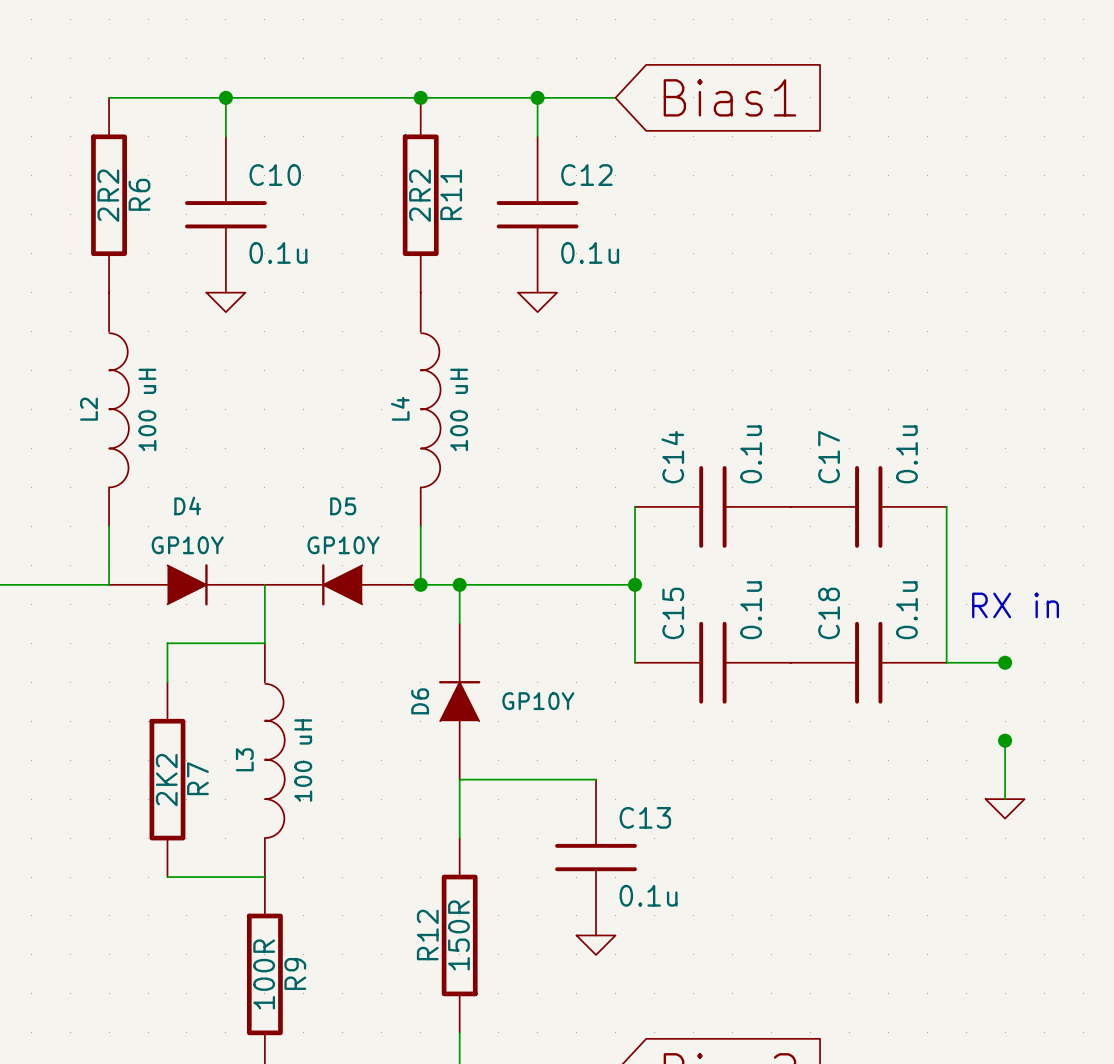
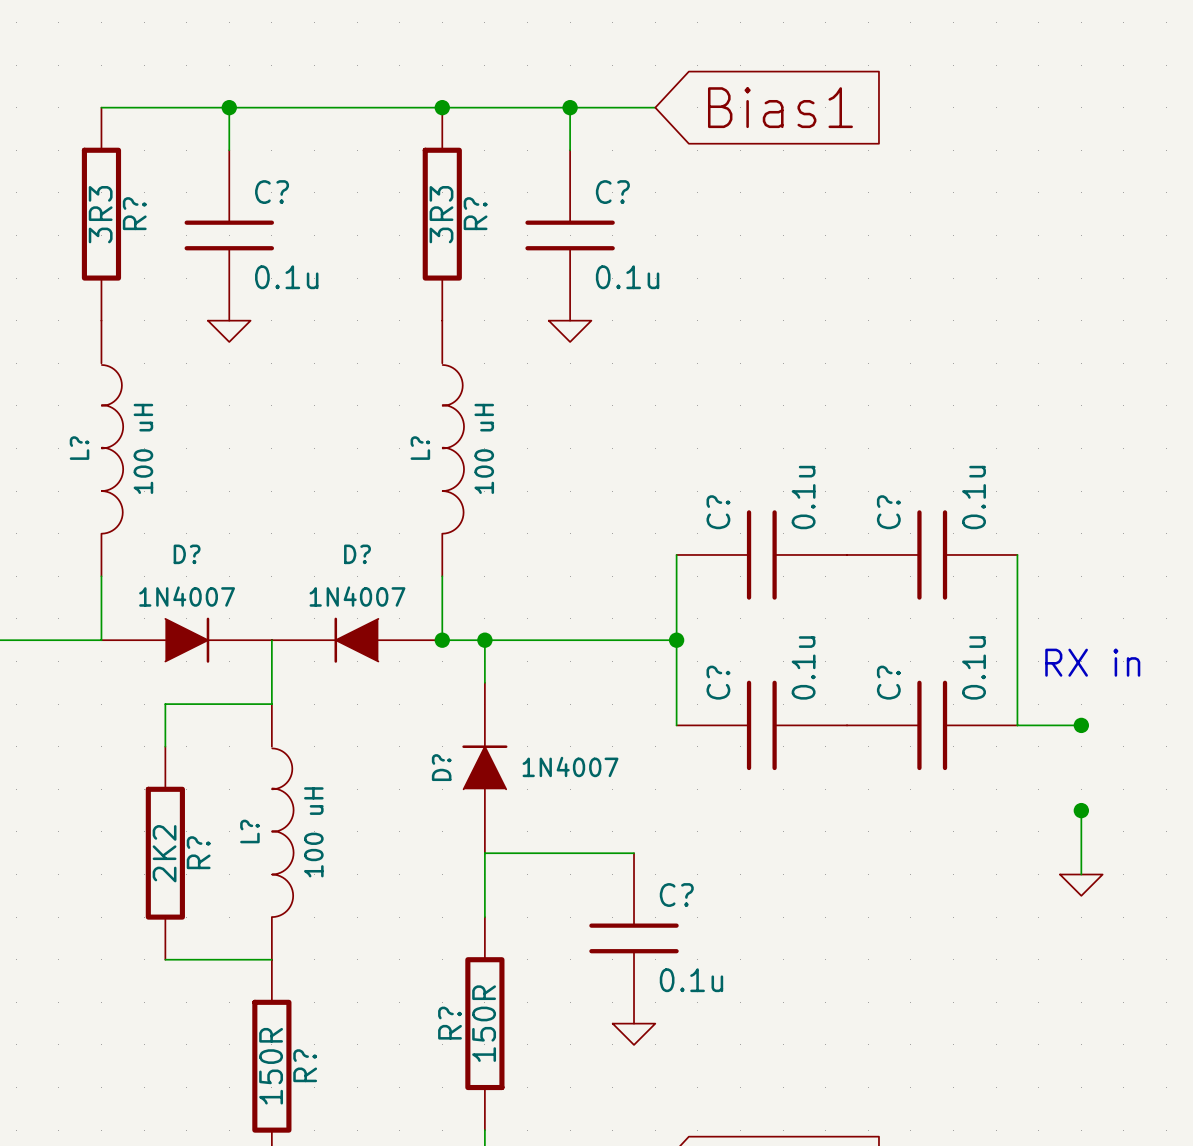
C10 name: C10 (275, 175) -> C? (272, 192)
C12 name: C12 (586, 175) -> C? (612, 192)
R6 name: R6 (139, 194) -> R? (134, 213)
R11 name: R11 (451, 194) -> R? (475, 213)
R6 value: 2R2 (108, 195) -> 3R3 (100, 214)
R11 value: 2R2 (419, 195) -> 3R3 (441, 214)
L4 name: L4 (400, 408) -> L? (420, 448)
L2 name: L2 (88, 409) -> L? (79, 448)
C14 name: C14 (672, 457) -> C? (718, 512)
C17 name: C17 (829, 457) -> C? (888, 512)
D4 name: D4 (187, 505) -> D? (187, 554)
D5 name: D5 (343, 506) -> D? (357, 554)
D4 value: GP10Y (187, 545) -> 1N4007 (187, 596)
D5 value: GP10Y (343, 545) -> 1N4007 (357, 596)
C15 name: C15 (673, 613) -> C? (718, 682)
C18 name: C18 (829, 613) -> C? (888, 682)
D6 name: D6 (420, 701) -> D? (441, 767)
D6 value: GP10Y (538, 701) -> 1N4007 (570, 766)
L3 name: L3 (244, 759) -> L? (249, 831)
R7 name: R7 (197, 778) -> R? (198, 852)
C13 name: C13 (645, 817) -> C? (676, 895)
R12 name: R12 (427, 935) -> R? (450, 1023)
R9 name: R9 (295, 973) -> R? (305, 1065)
R9 value: 100R (264, 974) -> 150R (271, 1066)

